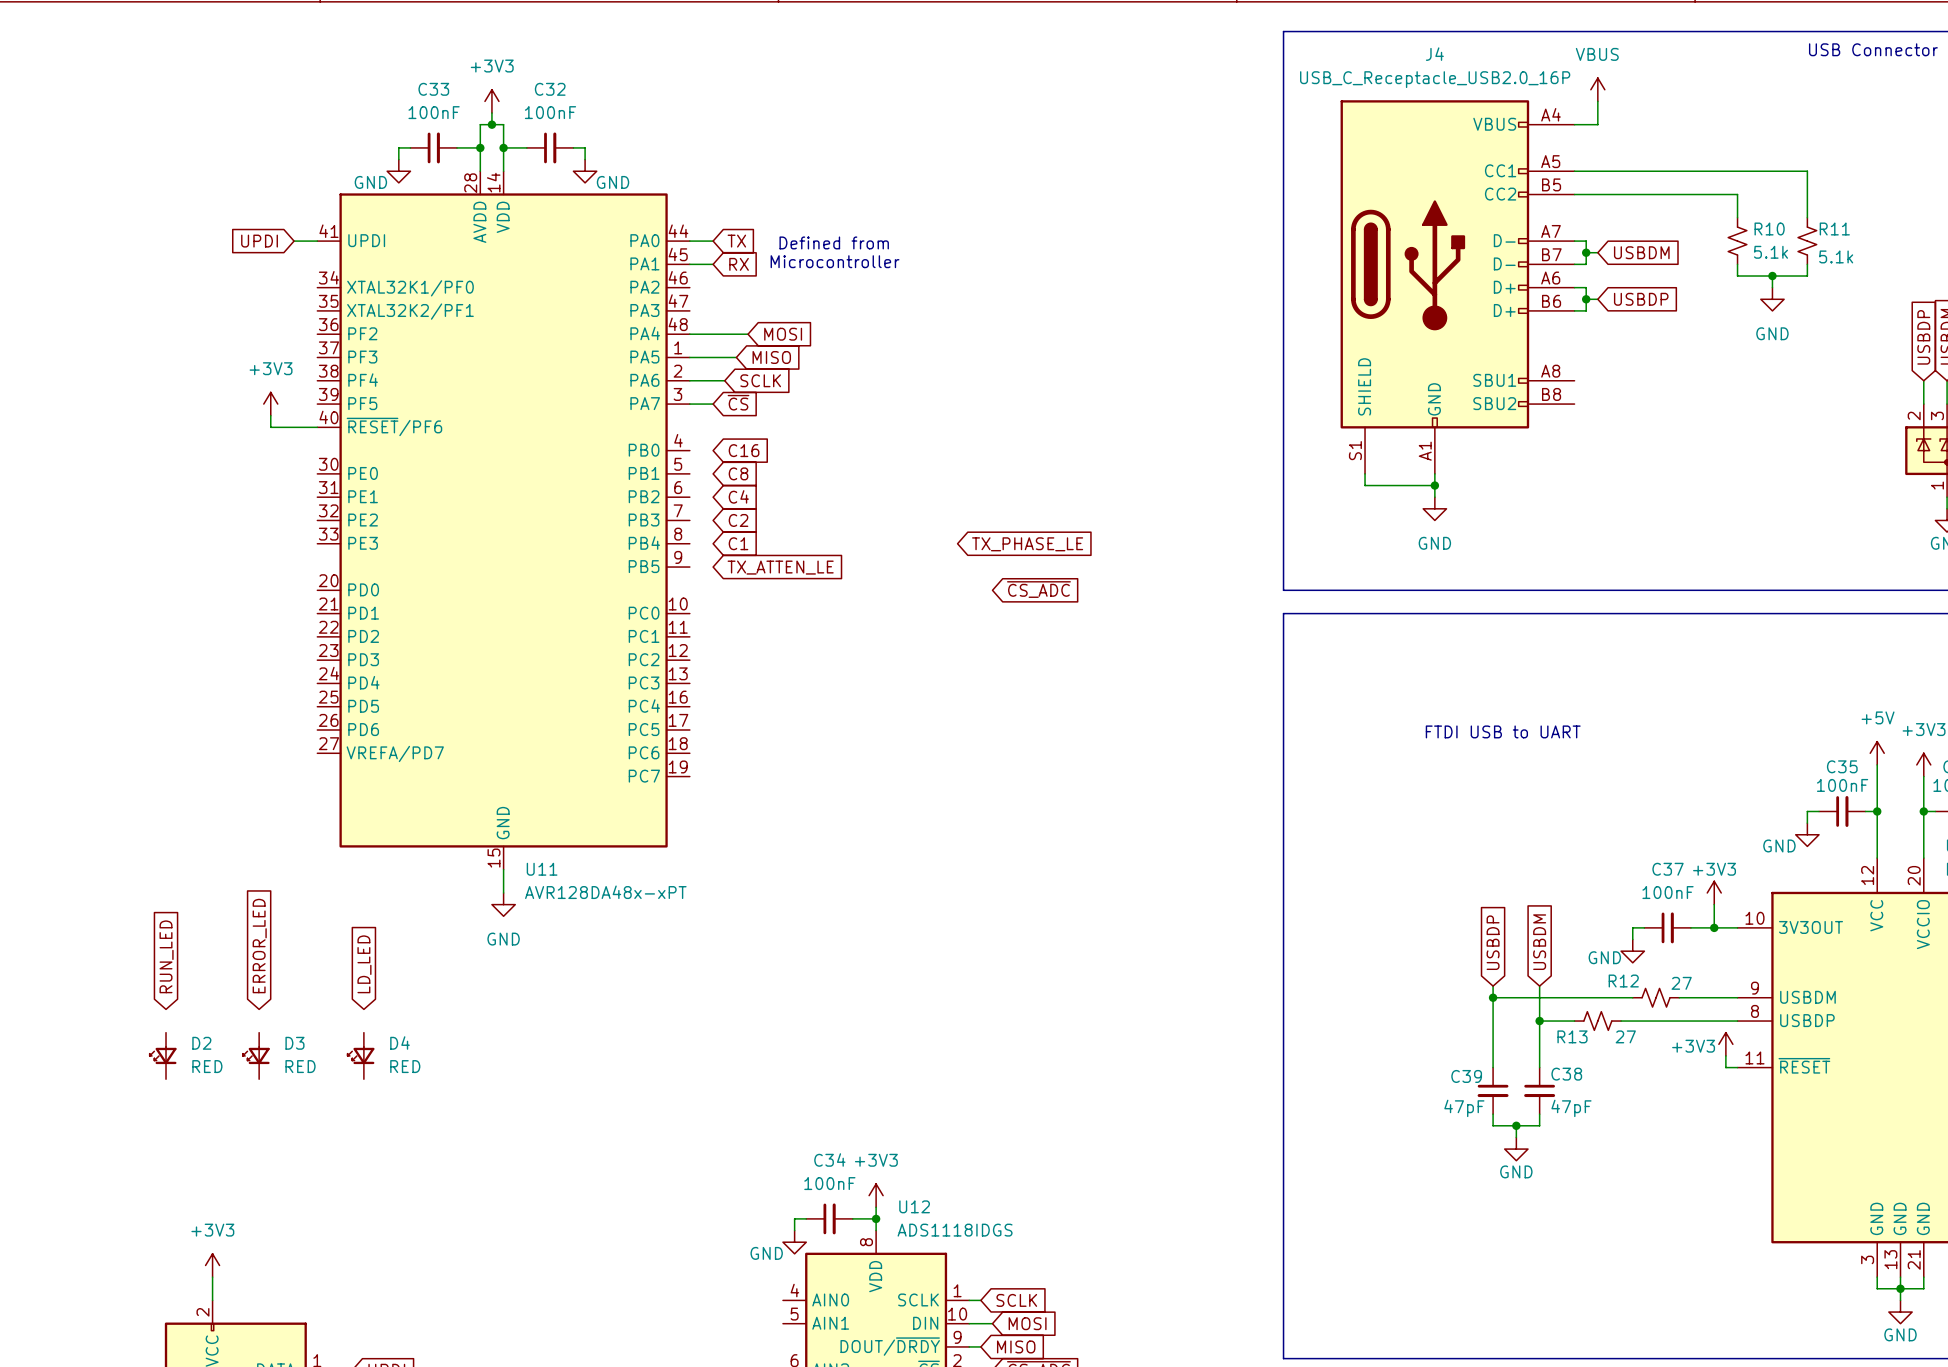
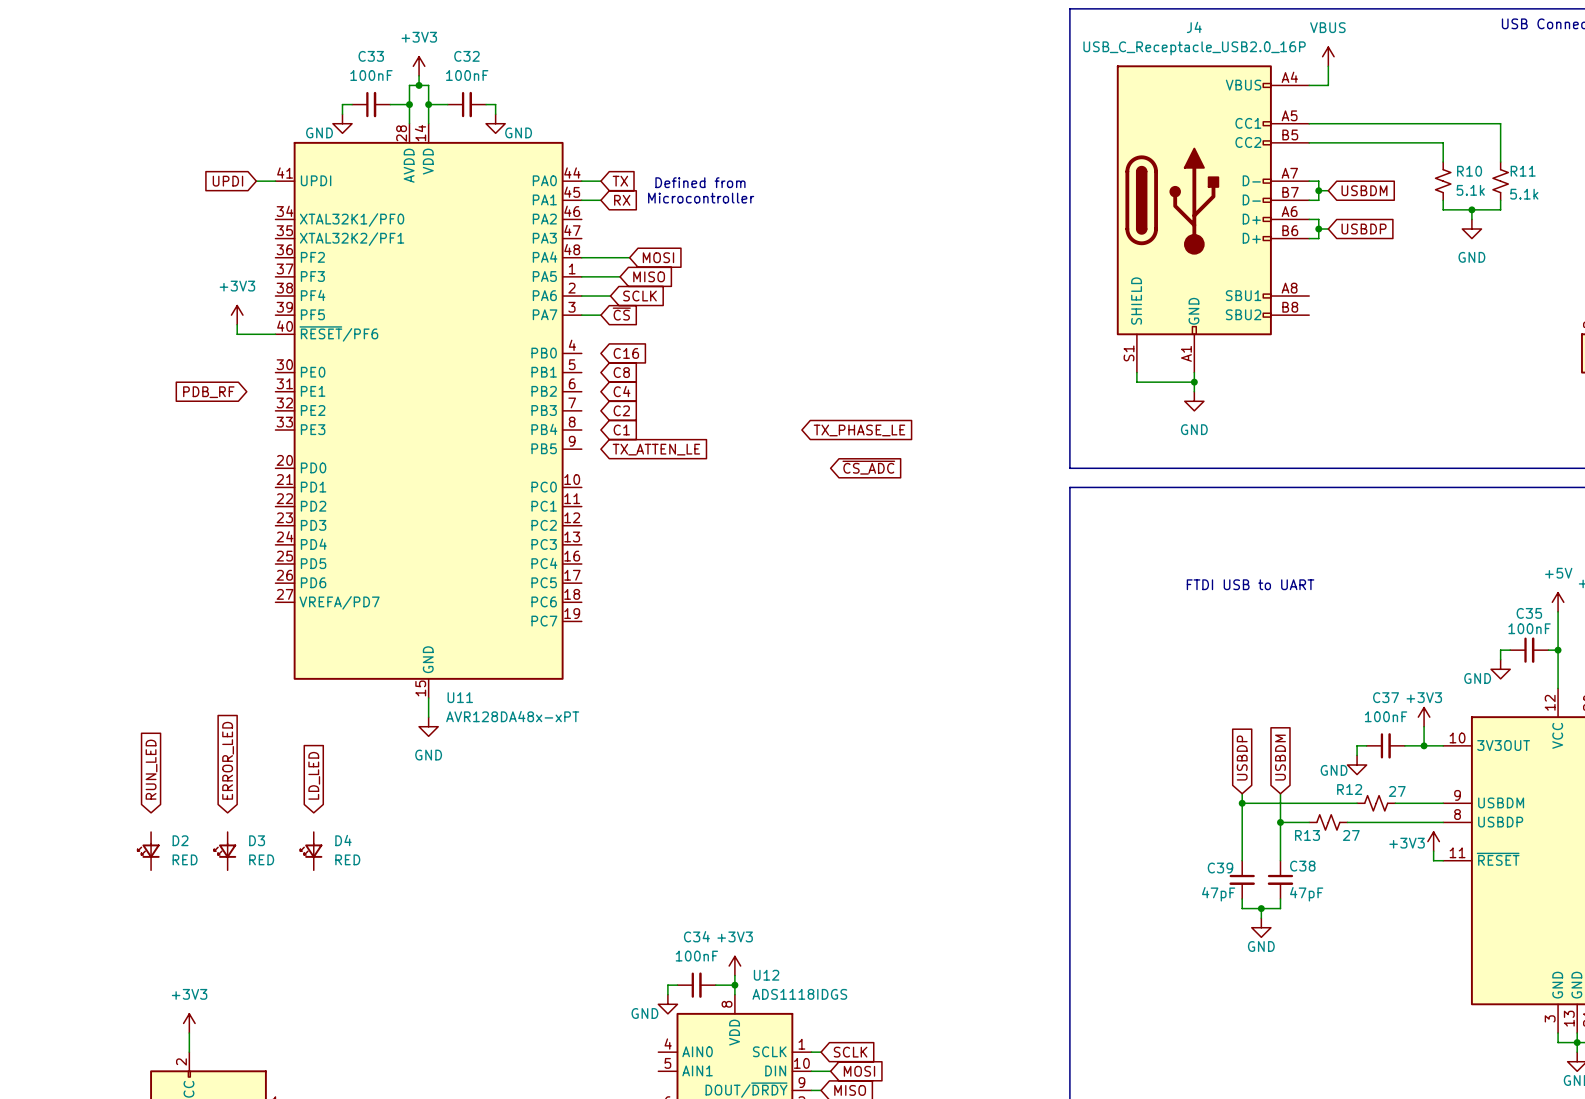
global label: none -> PDB_RF (208, 392)

